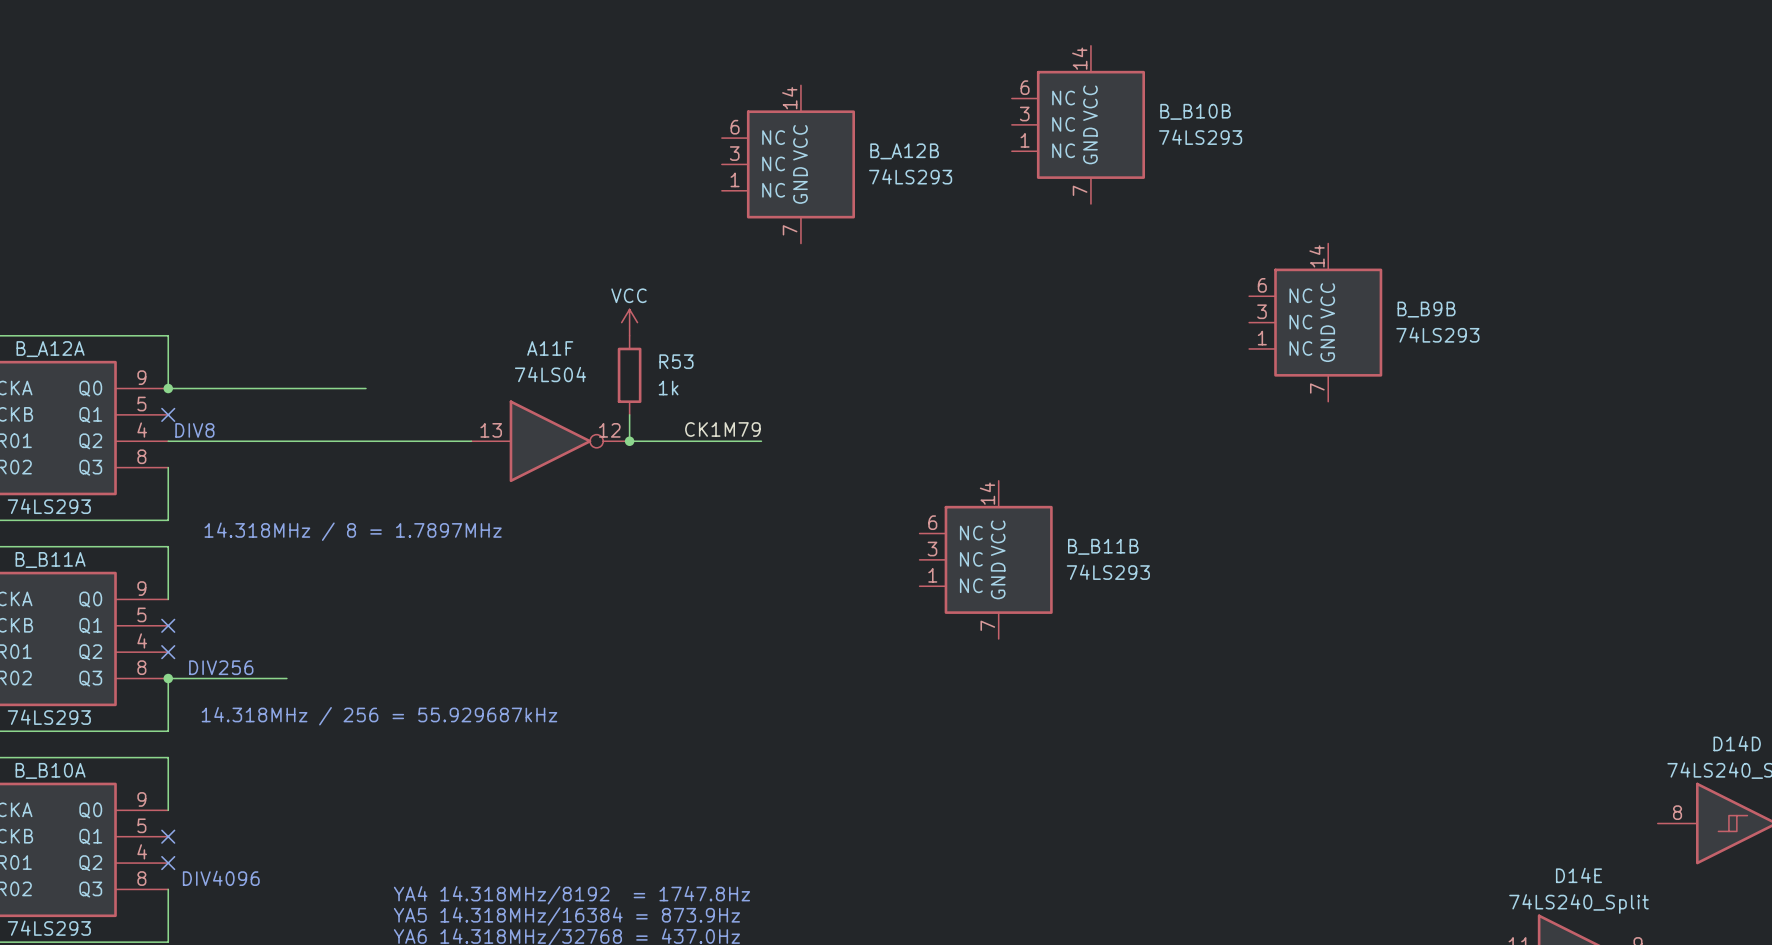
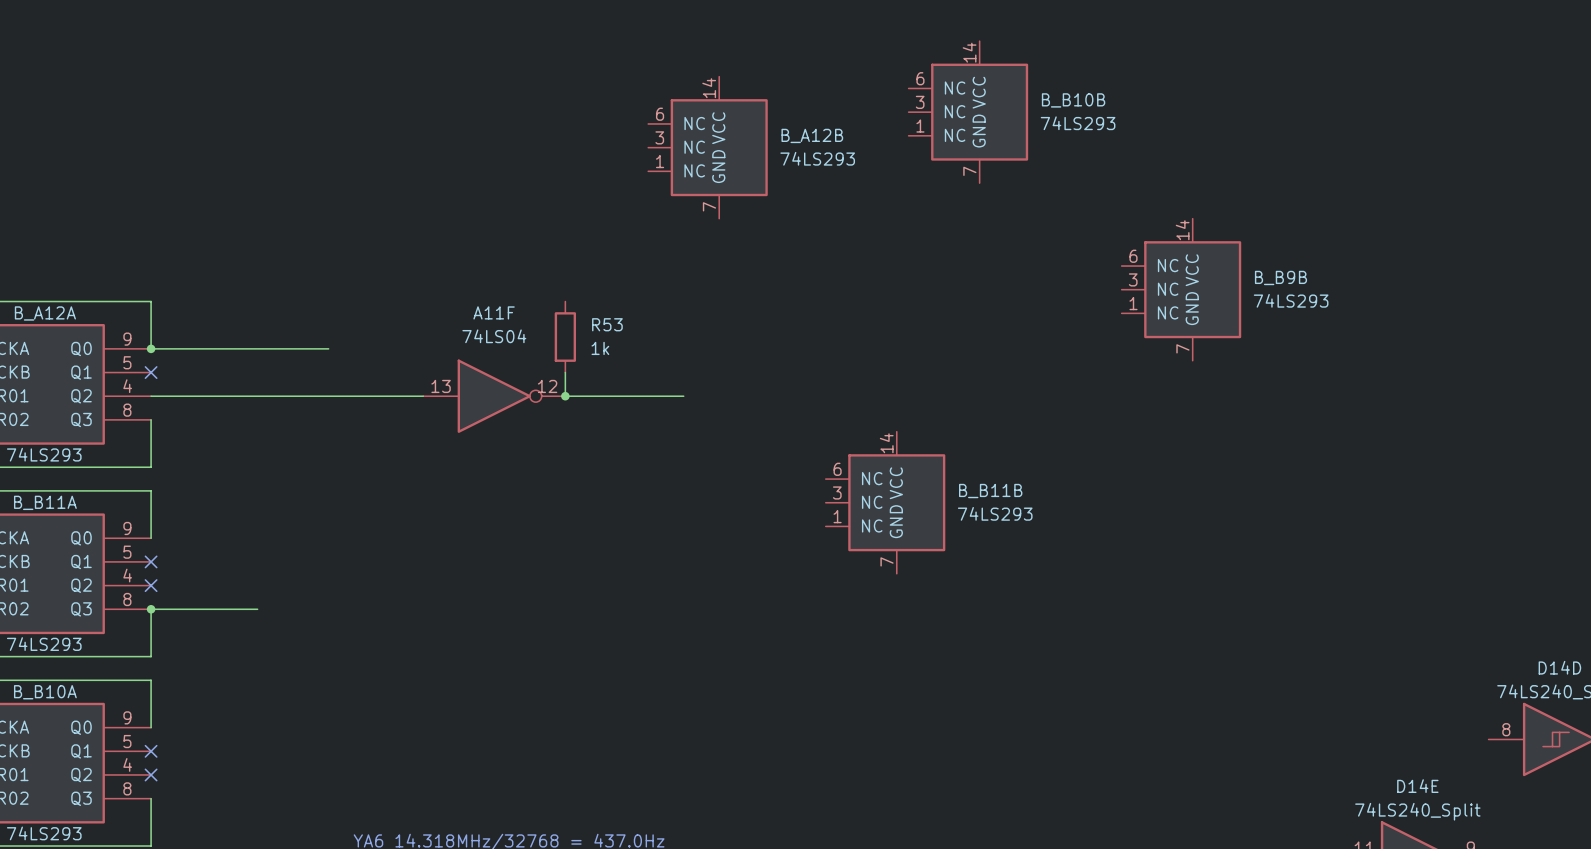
power symbol: VCC (629, 322) -> none
label: CK1M79 (722, 429) -> none
text: DIV8 (194, 430) -> none
text: 14.318MHz / 8 = 1.7897MHz (353, 531) -> none
text: DIV256 (221, 667) -> none
text: 14.318MHz / 256 = 55.929687kHz (379, 716) -> none
text: DIV4096 (221, 878) -> none
text: YA4 14.318MHz/8192 = 1747.8Hz (571, 895) -> none
text: YA5 14.318MHz/16384 = 873.9Hz (566, 916) -> none

